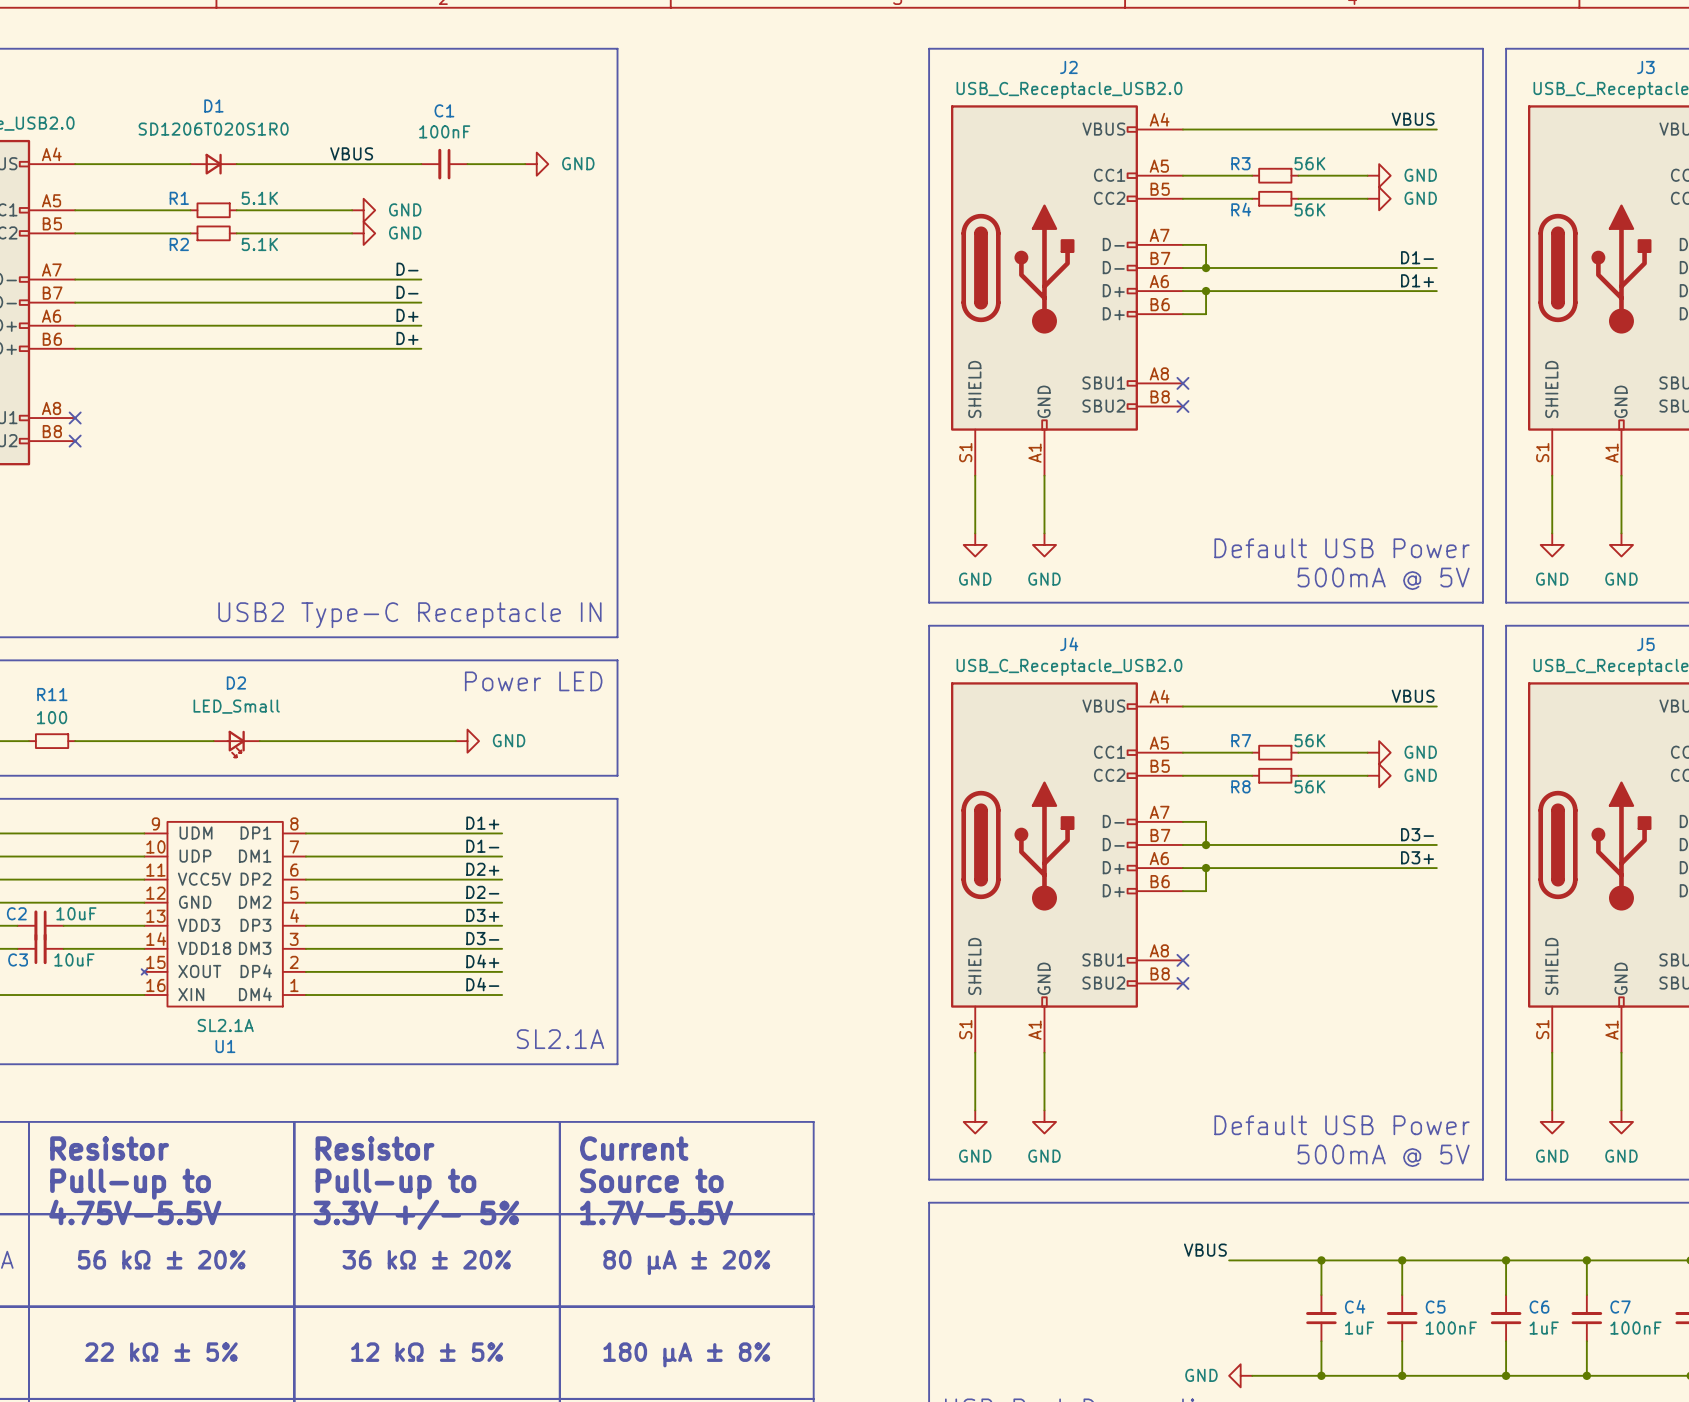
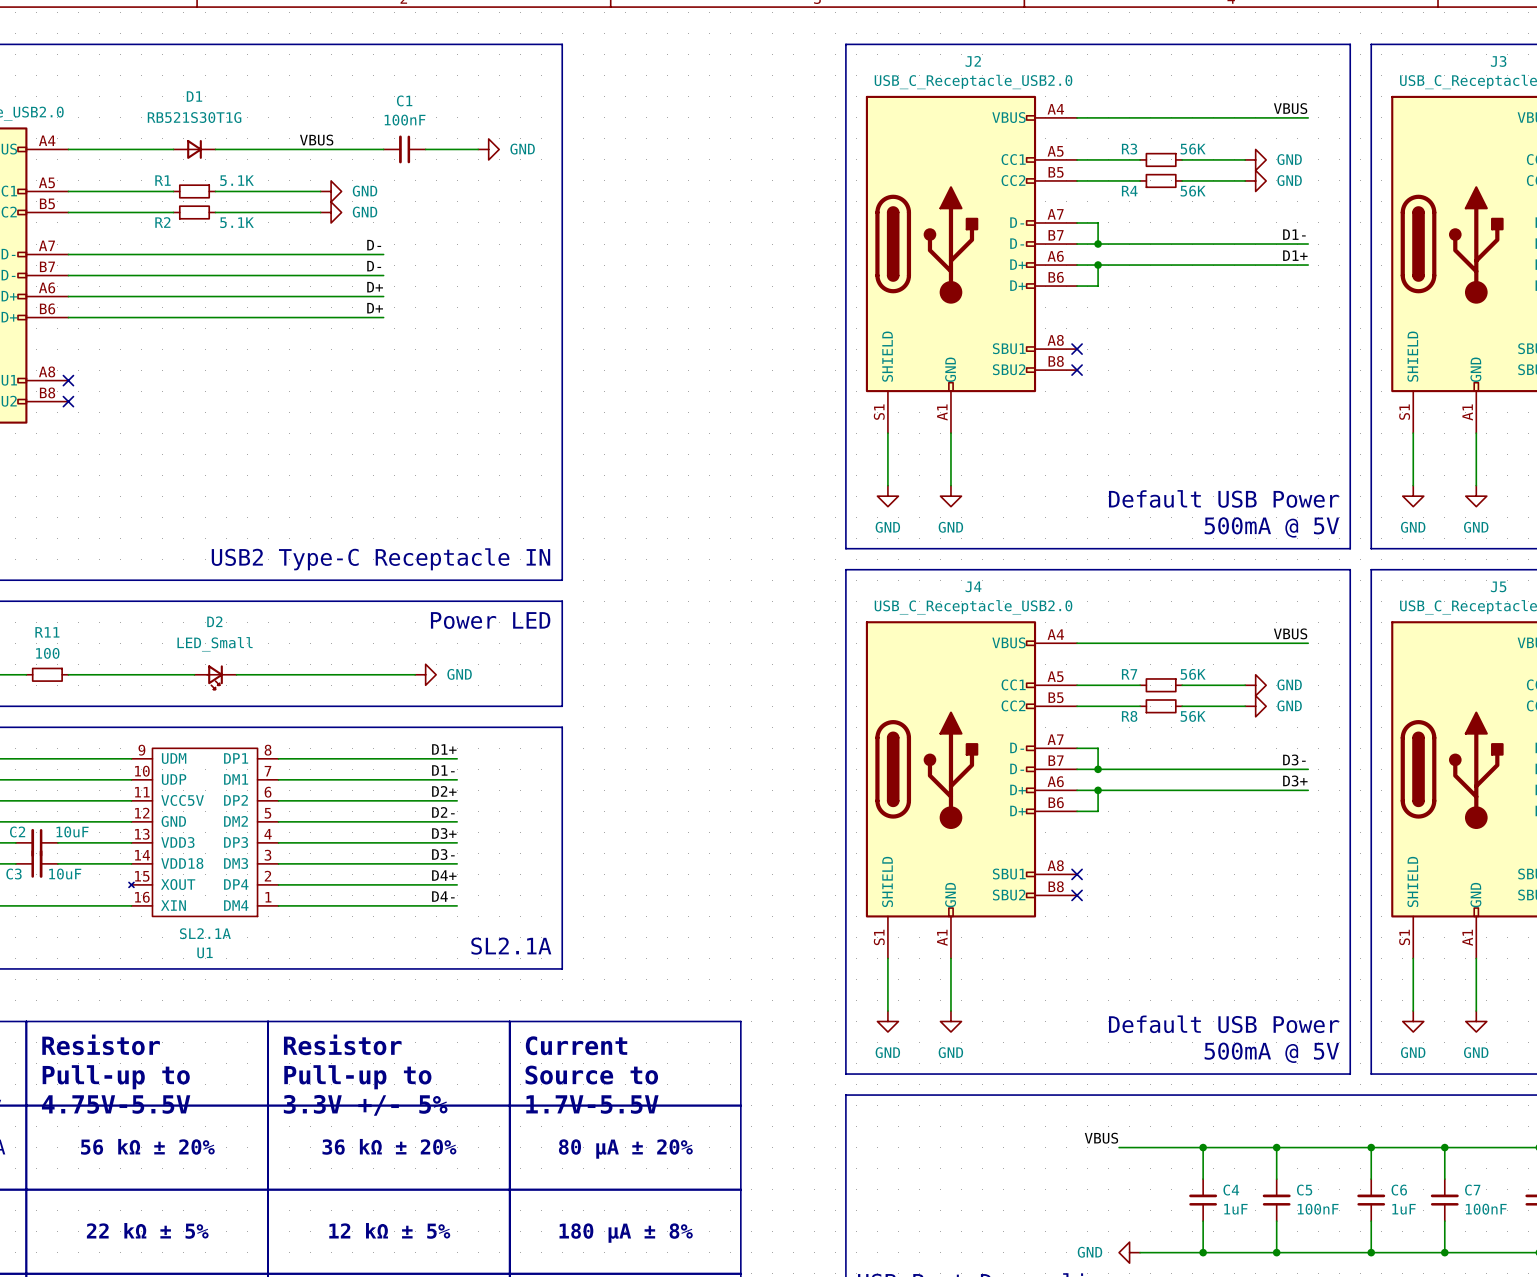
D1 value: SD1206T020S1R0 (213, 129) -> RB521S30T1G (194, 117)

